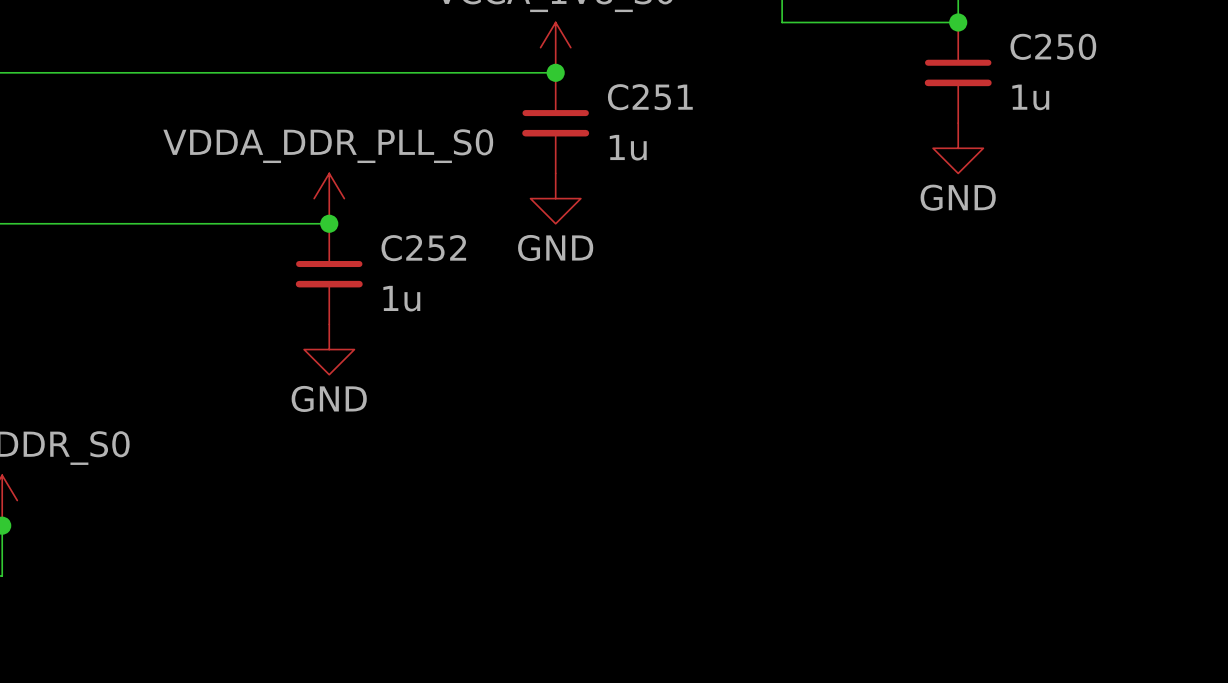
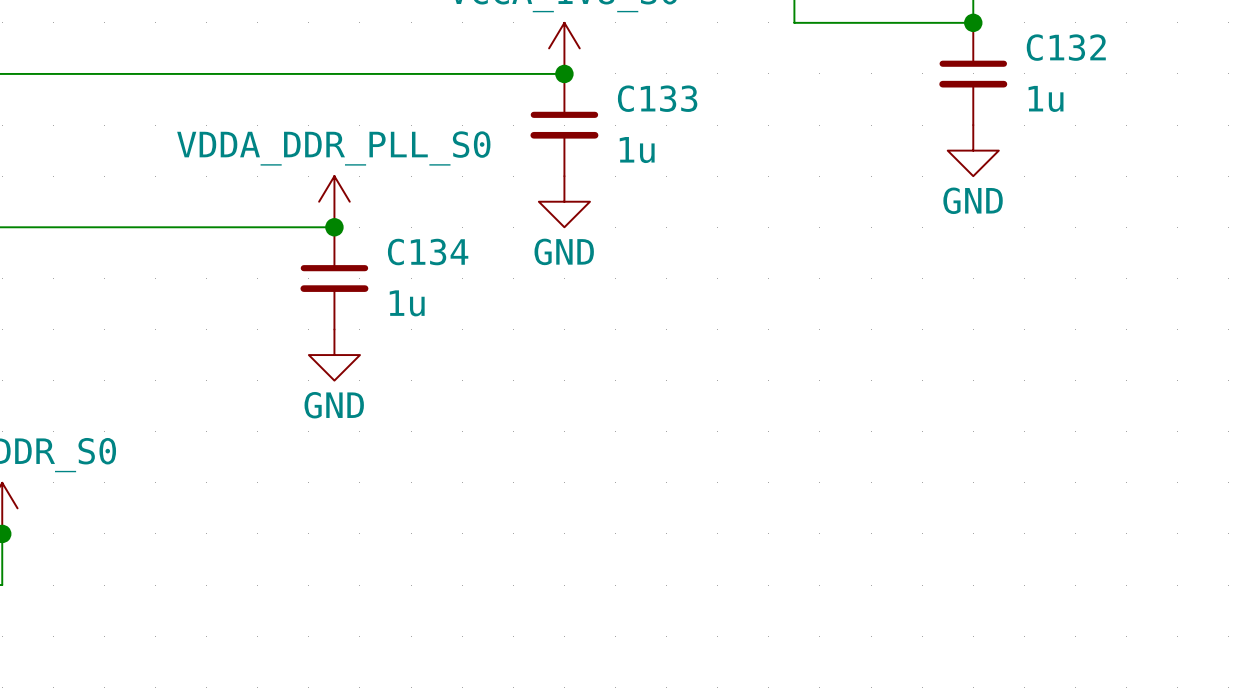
C250 name: C250 (1053, 46) -> C132 (1066, 47)
C251 name: C251 (650, 97) -> C133 (657, 98)
C252 name: C252 (423, 248) -> C134 (428, 252)

